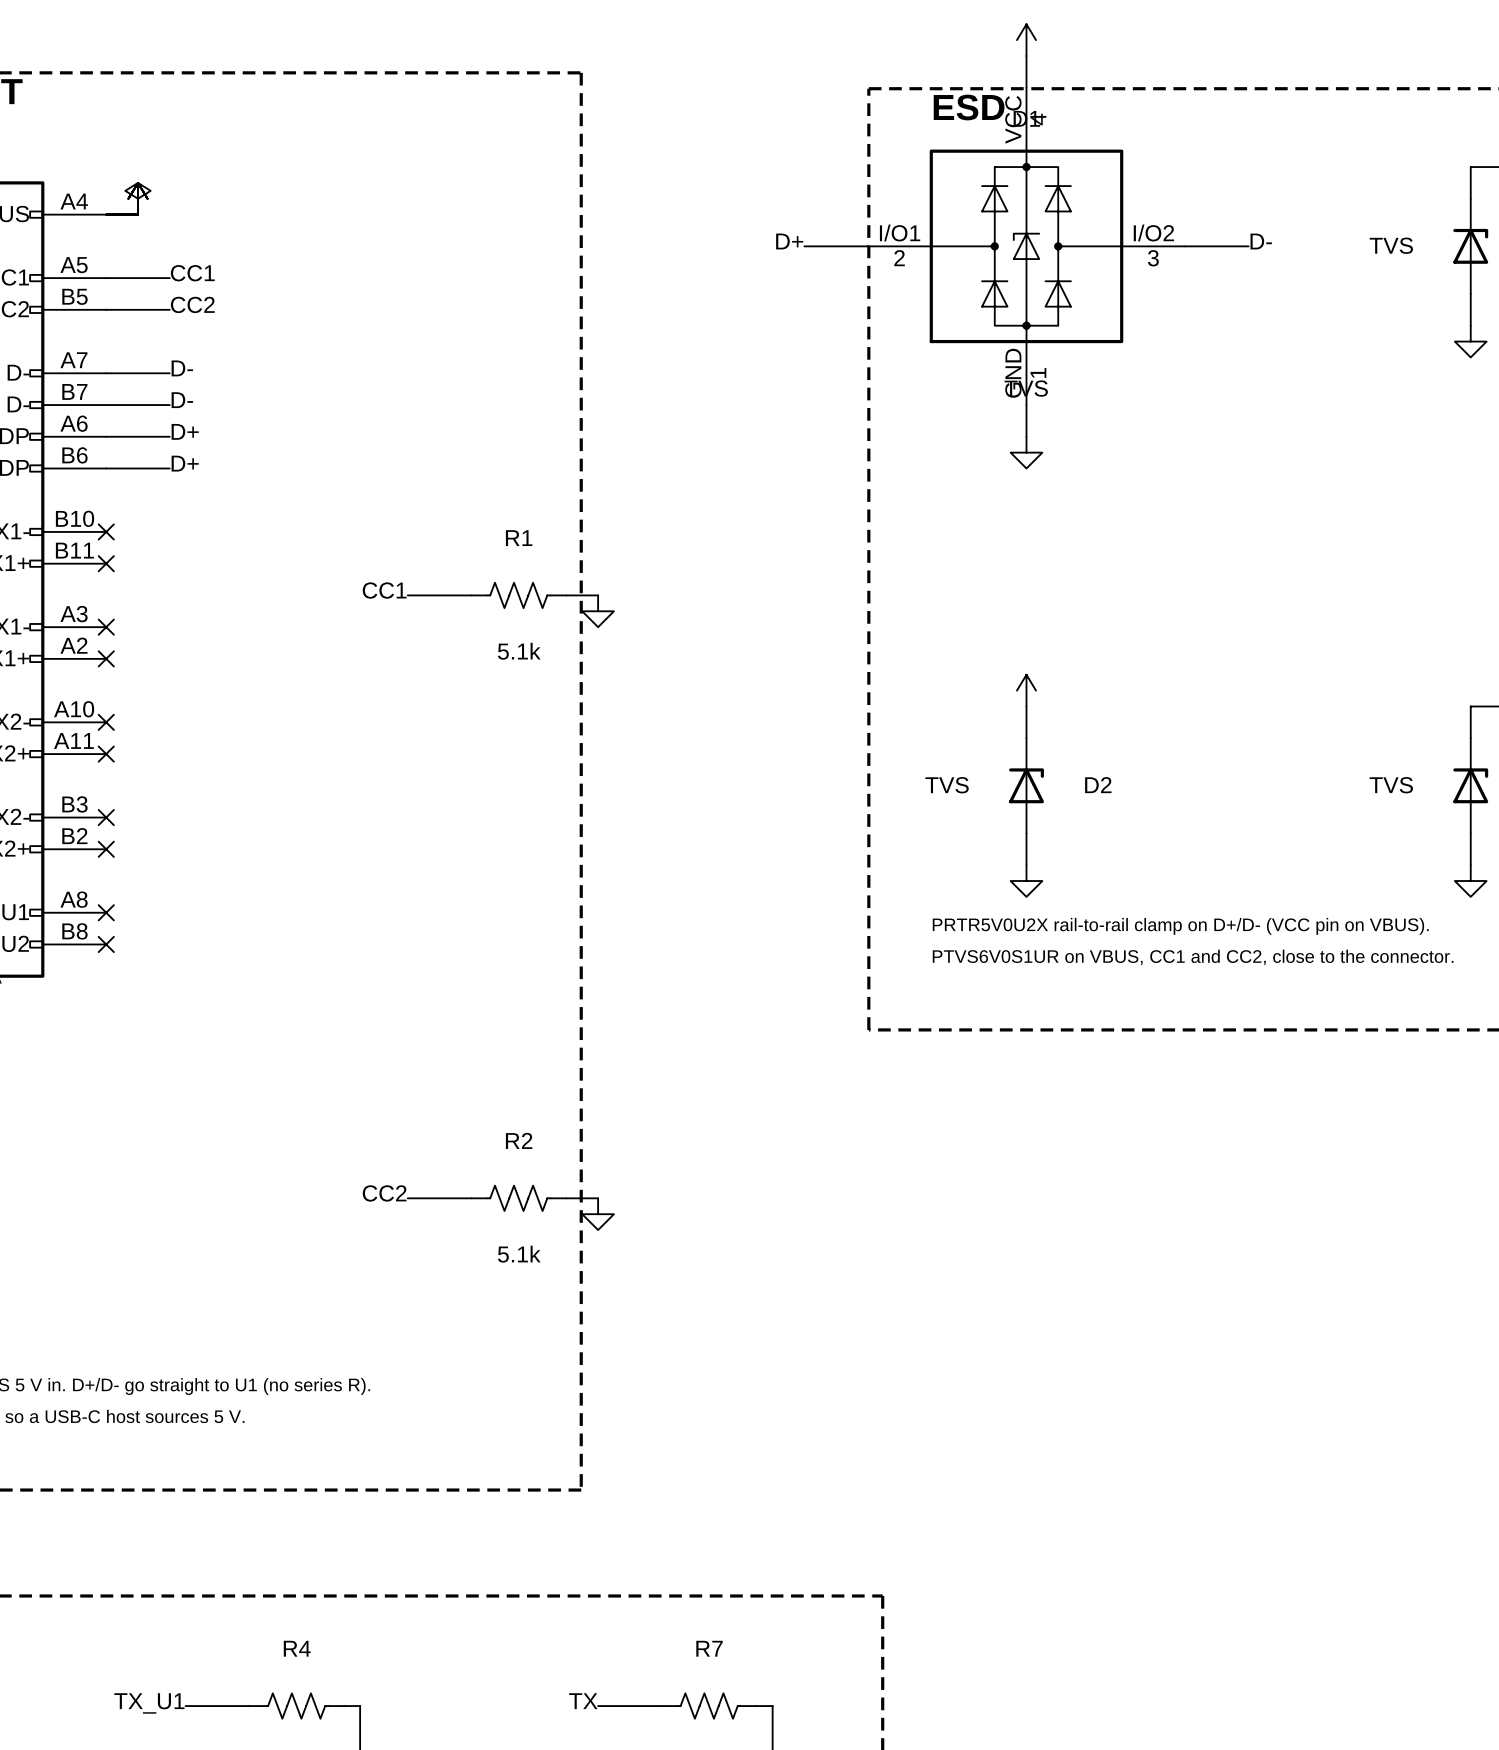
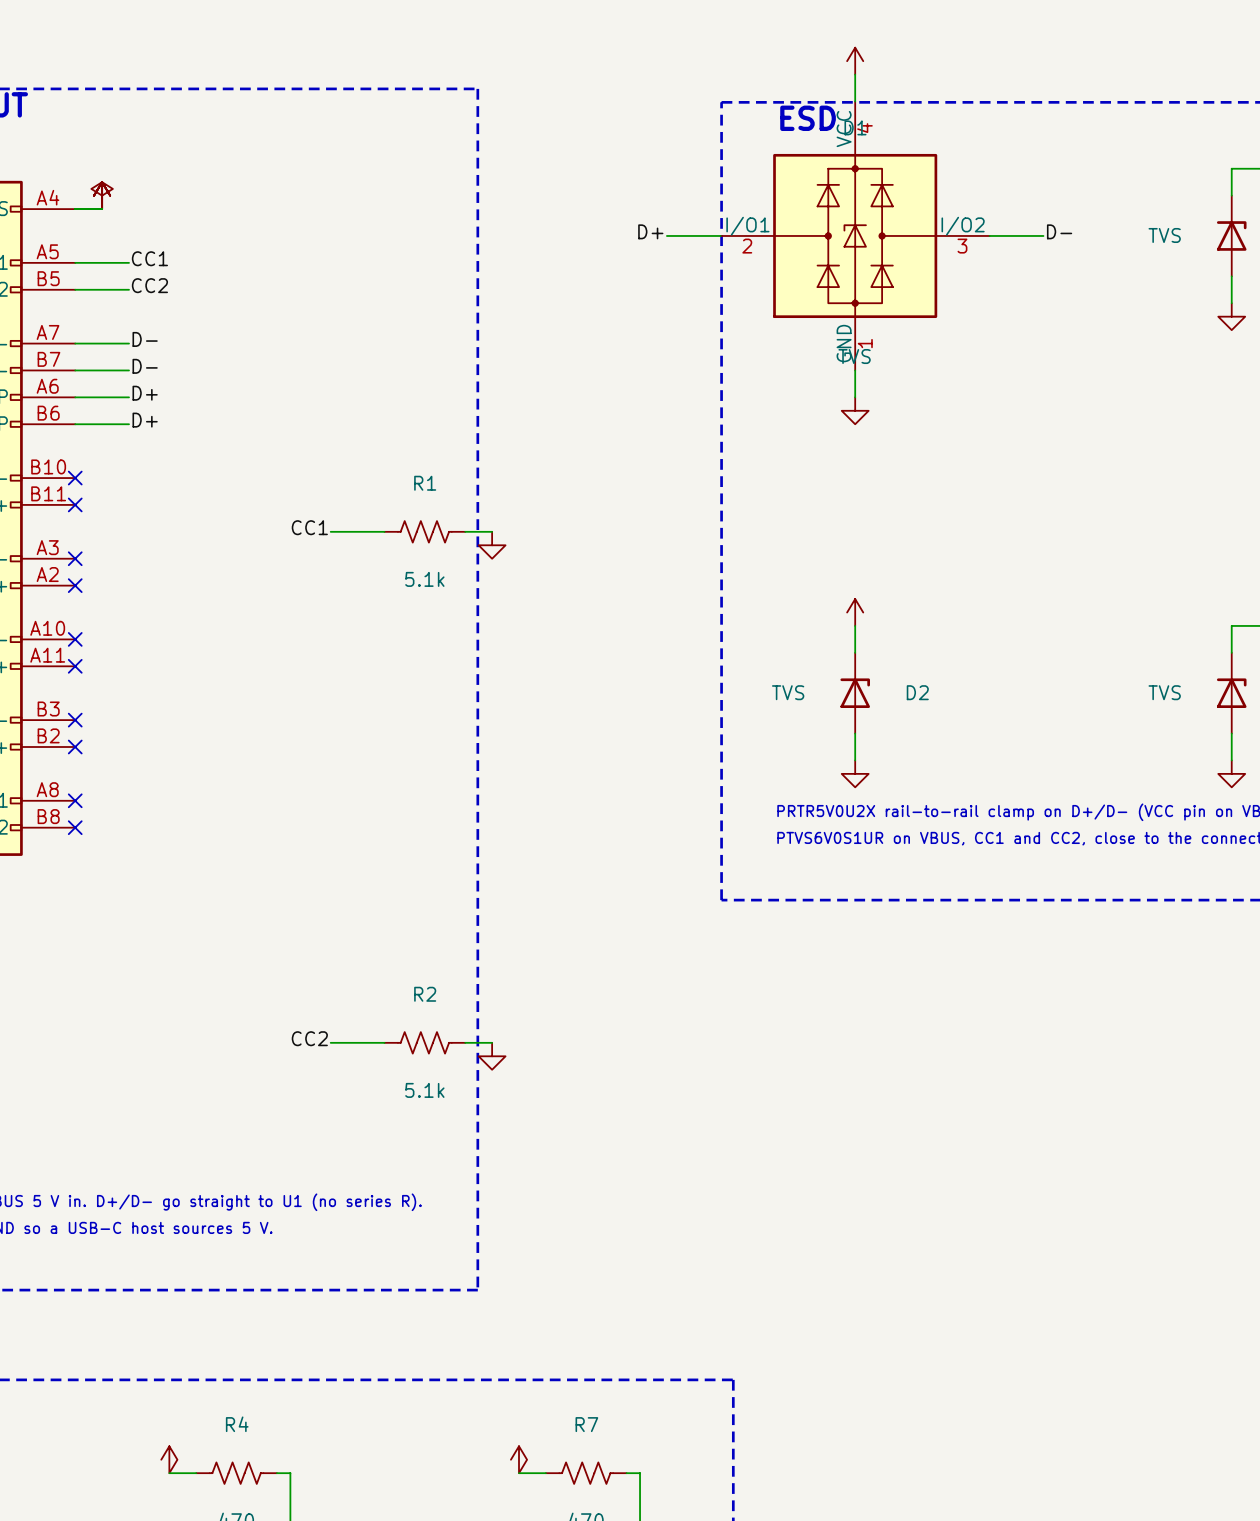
power symbol: none -> (169, 1459)
power symbol: none -> (519, 1459)
label: TX (583, 1701) -> none
label: TX_U1 (149, 1703) -> none
wire: (185, 1706) (217, 1706) -> none
wire: (598, 1706) (629, 1706) -> none

